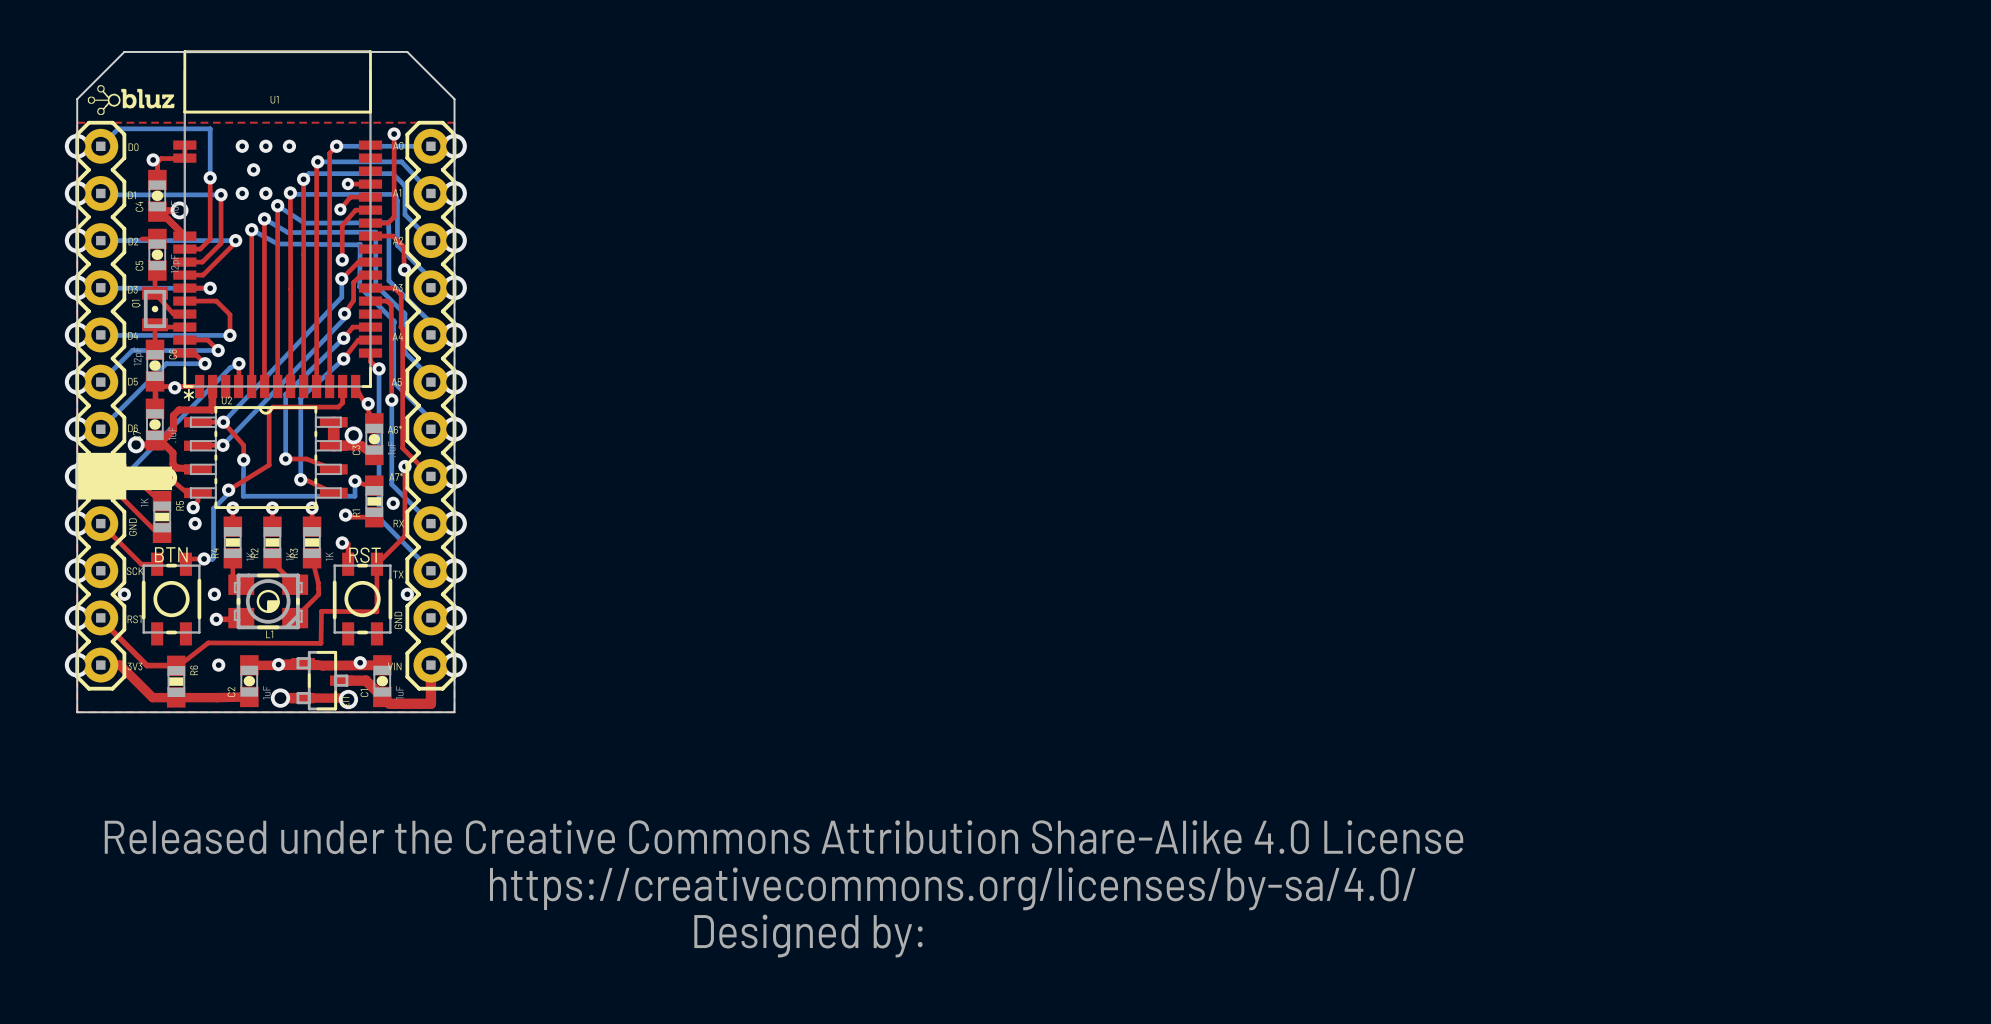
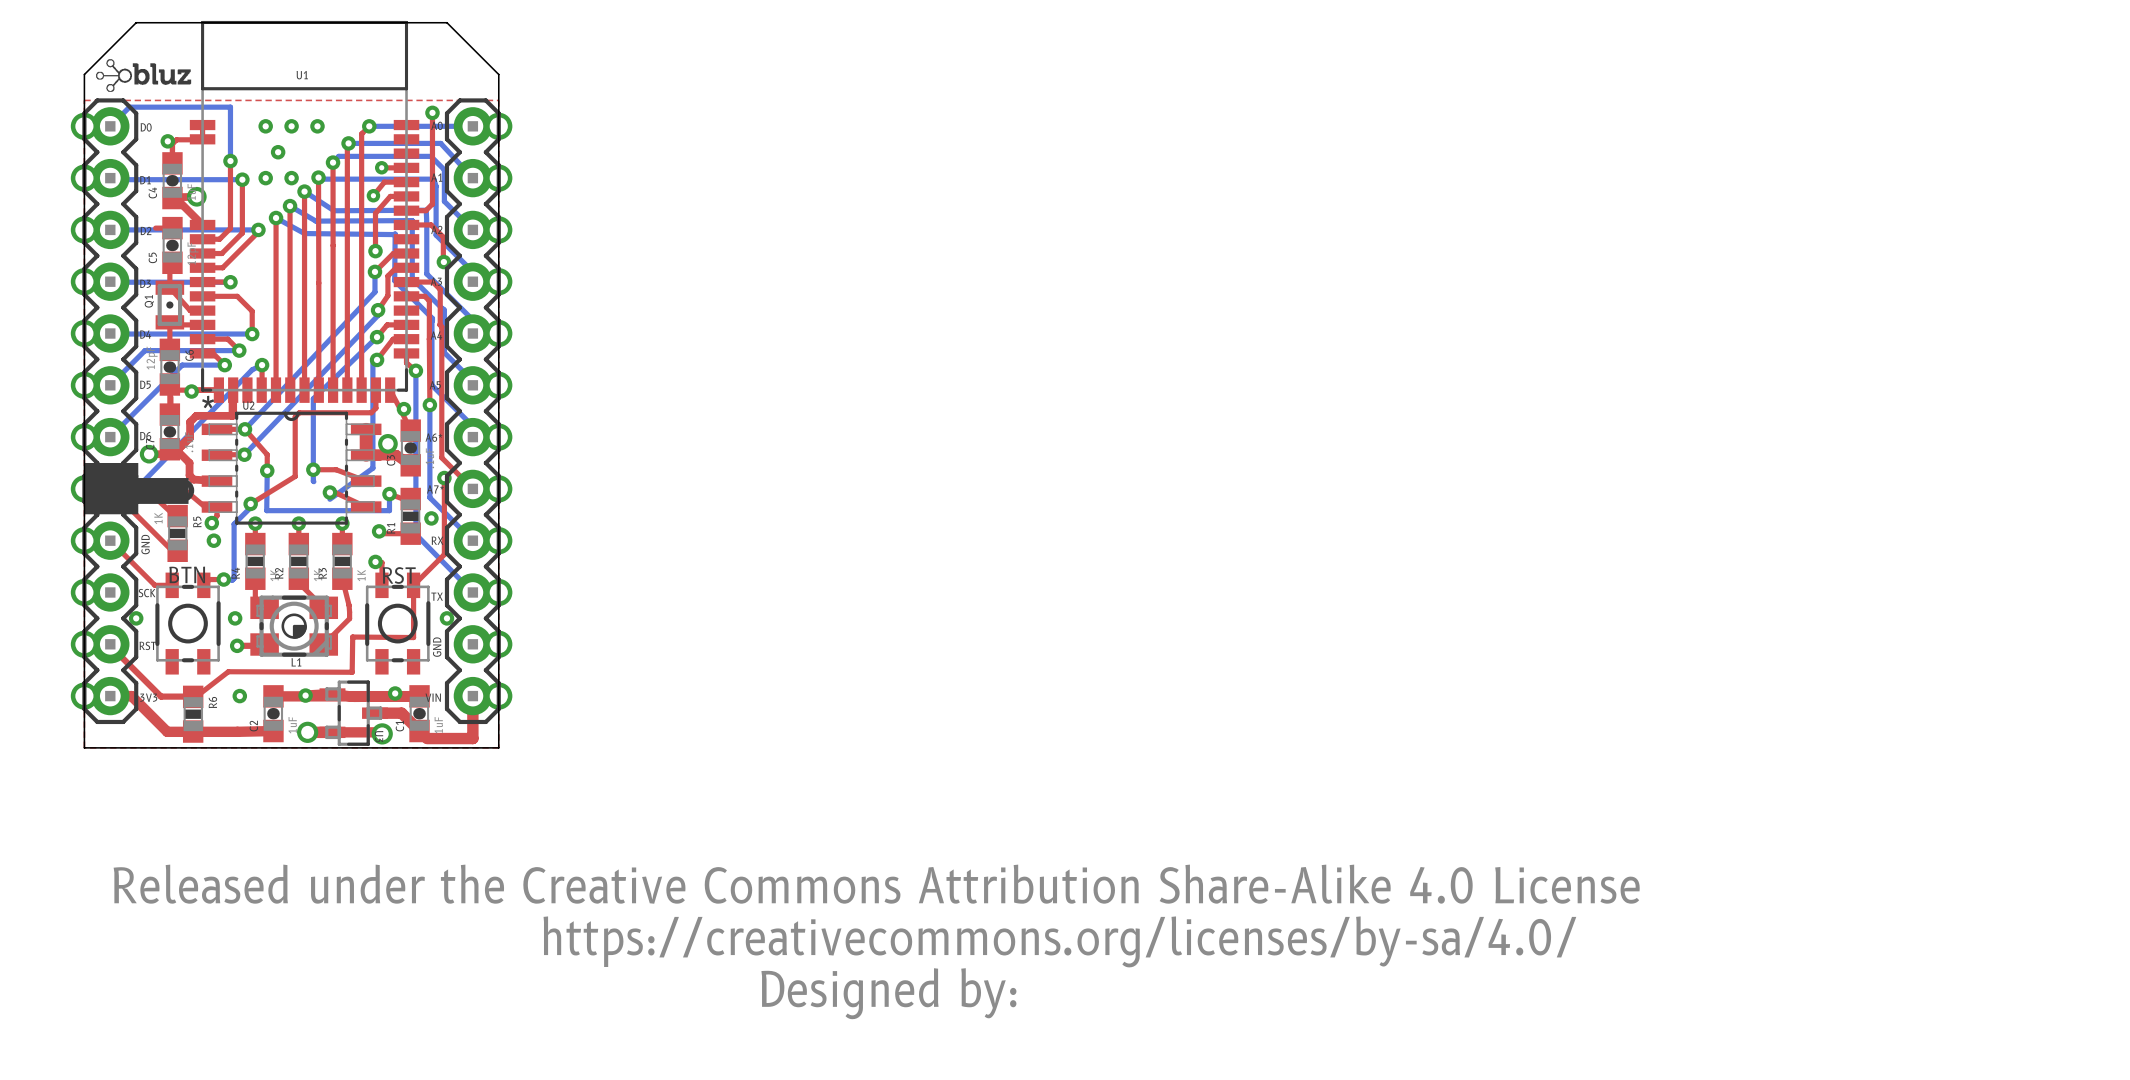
bottom track: none -> (372, 359) (372, 468) (329, 499)
bottom track: (343, 358) (300, 398) (300, 479) -> none
bottom track: none -> (313, 469) (313, 481)

